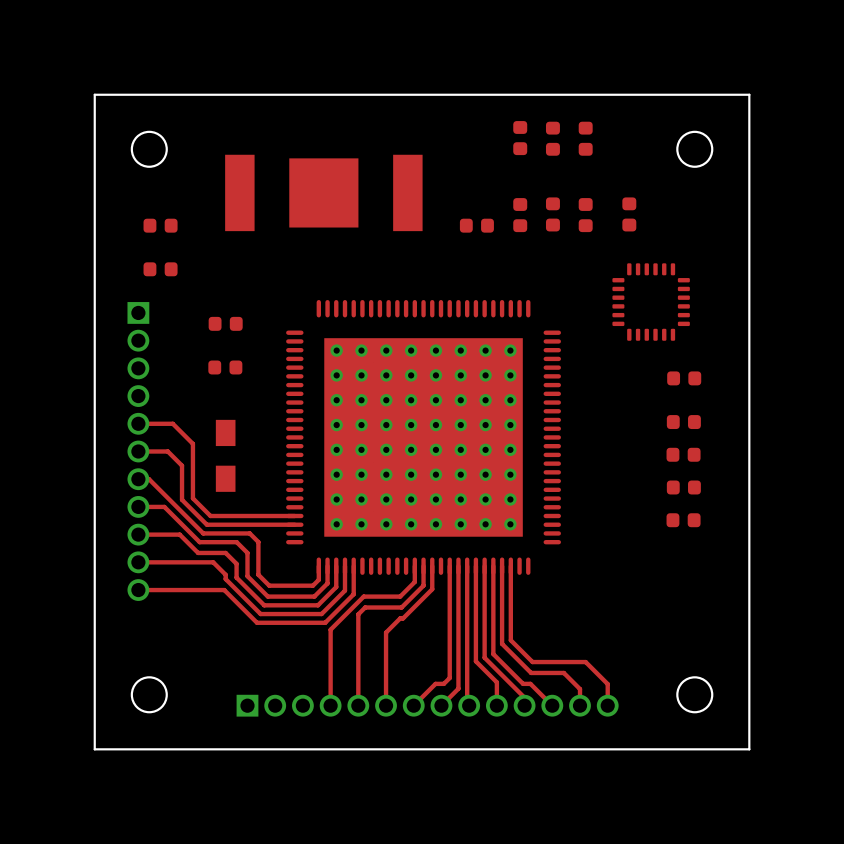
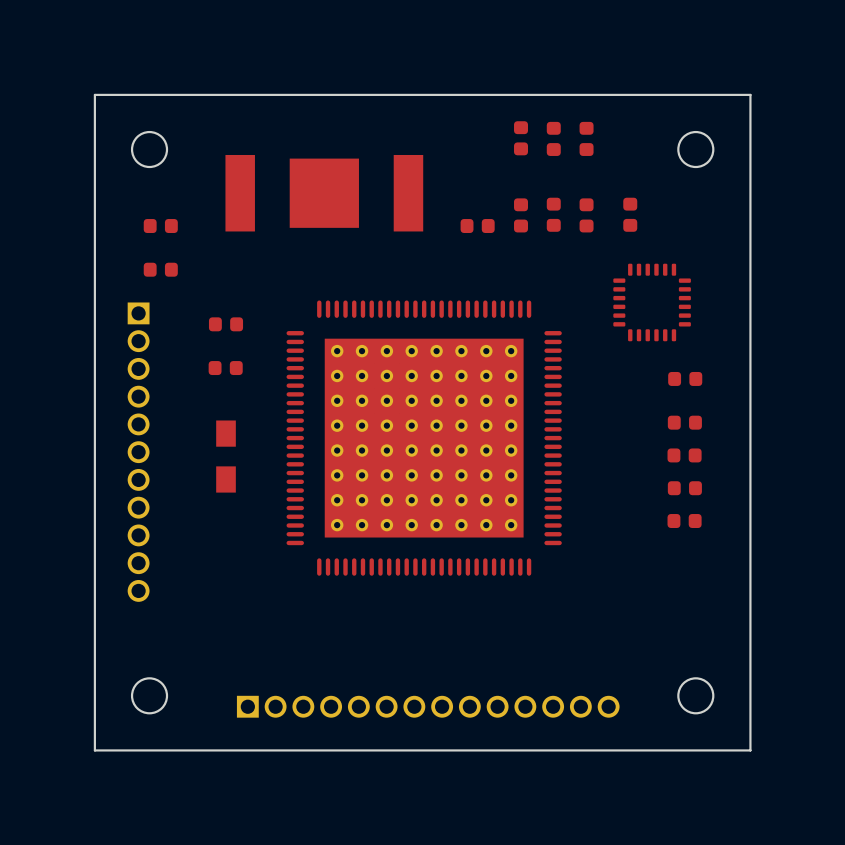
top track: (138, 423) (172, 423) (192, 443) (192, 498) (210, 516) (294, 516) -> none
top track: (138, 451) (167, 451) (182, 465) (182, 499) (206, 524) (294, 524) -> none
top track: (138, 479) (149, 479) (203, 533) (249, 533) (258, 542) (258, 574) (269, 585) (312, 585) (318, 579) (318, 566) -> none
top track: (138, 506) (164, 506) (199, 542) (236, 542) (247, 552) (247, 576) (267, 596) (314, 596) (327, 583) (327, 566) -> none
top track: (138, 534) (179, 534) (198, 552) (225, 552) (236, 563) (236, 577) (264, 605) (317, 605) (336, 587) (336, 566) -> none
top track: (138, 562) (213, 562) (225, 574) (225, 579) (260, 614) (321, 614) (344, 590) (344, 566) -> none
top track: (353, 566) (353, 594) (325, 622) (257, 622) (224, 590) (138, 590) -> none
top track: (414, 566) (414, 582) (400, 596) (363, 596) (330, 629) (330, 705) -> none
top track: (423, 566) (423, 585) (401, 607) (365, 607) (358, 614) (358, 705) -> none
top track: (432, 566) (432, 589) (386, 632) (386, 705) -> none
top track: (449, 566) (449, 678) (443, 683) (435, 683) (413, 705) -> none
top track: (458, 566) (458, 688) (441, 705) -> none
top track: (467, 566) (467, 703) (469, 705) -> none
top track: (475, 566) (475, 661) (496, 682) (496, 705) -> none
top track: (484, 566) (484, 657) (524, 697) (524, 705) -> none
top track: (493, 566) (493, 654) (523, 683) (530, 683) (552, 705) -> none
top track: (502, 566) (502, 643) (531, 672) (563, 672) (580, 689) (580, 705) -> none
top track: (510, 566) (510, 640) (532, 662) (585, 662) (607, 684) (607, 705) -> none

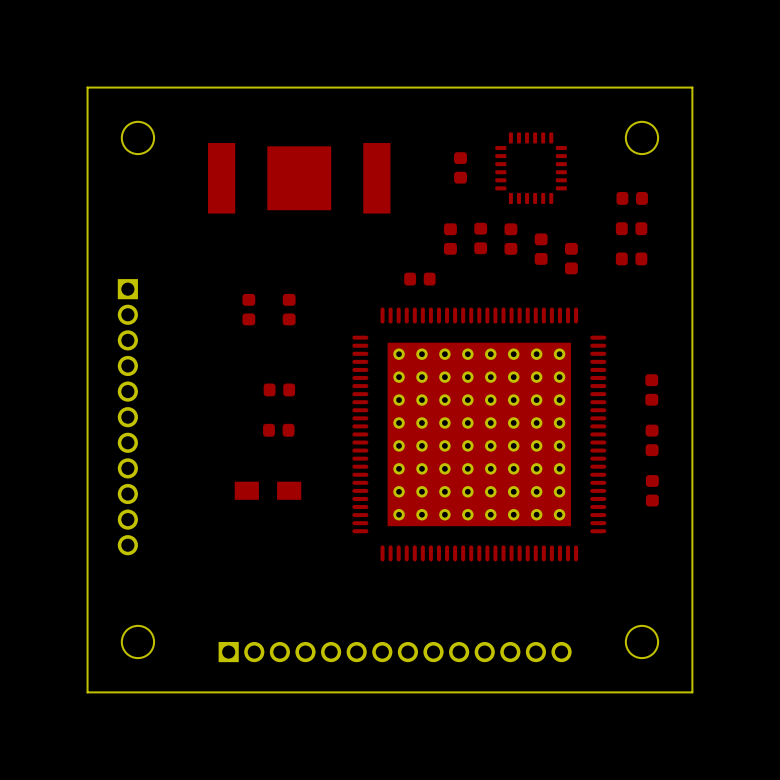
part: (521, 138) -> none
part: (553, 138) -> none
part: (586, 138) -> none
part: none -> (460, 167)
part: (553, 214) -> none
part: (630, 214) -> none
part: (521, 215) -> none
part: (586, 215) -> none
part: none -> (632, 198)
part: (160, 226) -> none
part: (477, 226) -> none
part: none -> (631, 228)
part: none -> (480, 238)
part: none -> (450, 239)
part: none -> (510, 239)
part: (160, 269) -> none
part: none -> (541, 249)
part: none -> (571, 258)
part: none -> (631, 258)
part: none -> (419, 279)
part position: (652, 302) -> (531, 168)
part: (226, 324) -> none
part: none -> (248, 309)
part: none -> (289, 309)
part: (225, 368) -> none
part: (685, 378) -> none
part: none -> (279, 389)
part: (684, 422) -> none
part: none -> (651, 389)
part position: (424, 438) -> (479, 434)
part: (684, 455) -> none
part rotation: 0° (226, 456) -> 90° clockwise (267, 490)
part position: (226, 456) -> (267, 490)
part: none -> (278, 430)
part: none -> (652, 440)
part: (684, 488) -> none
part: (684, 521) -> none
part: none -> (652, 490)

